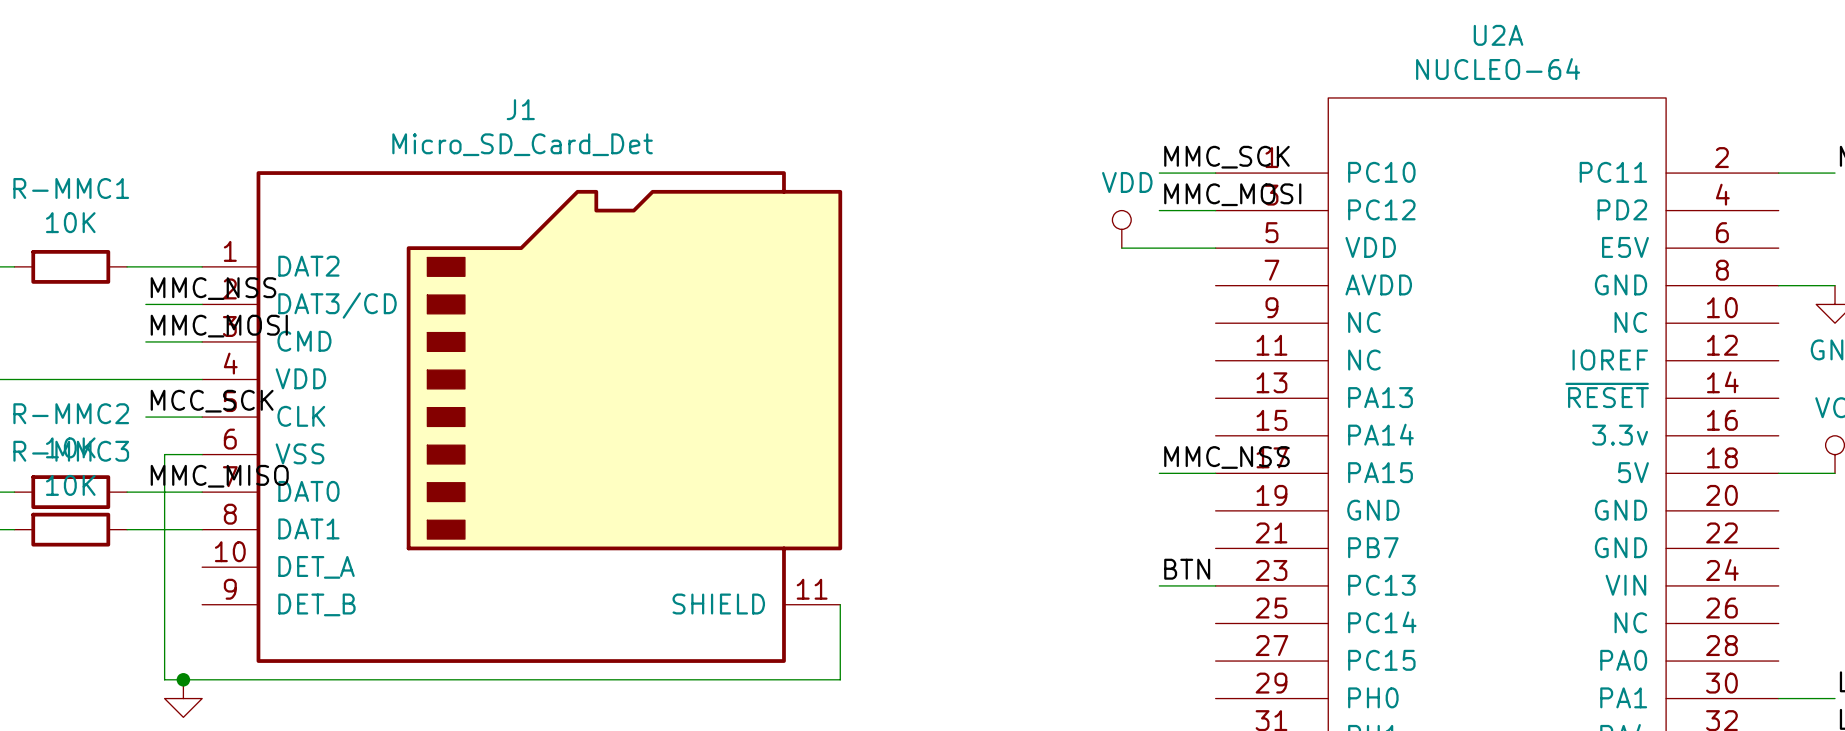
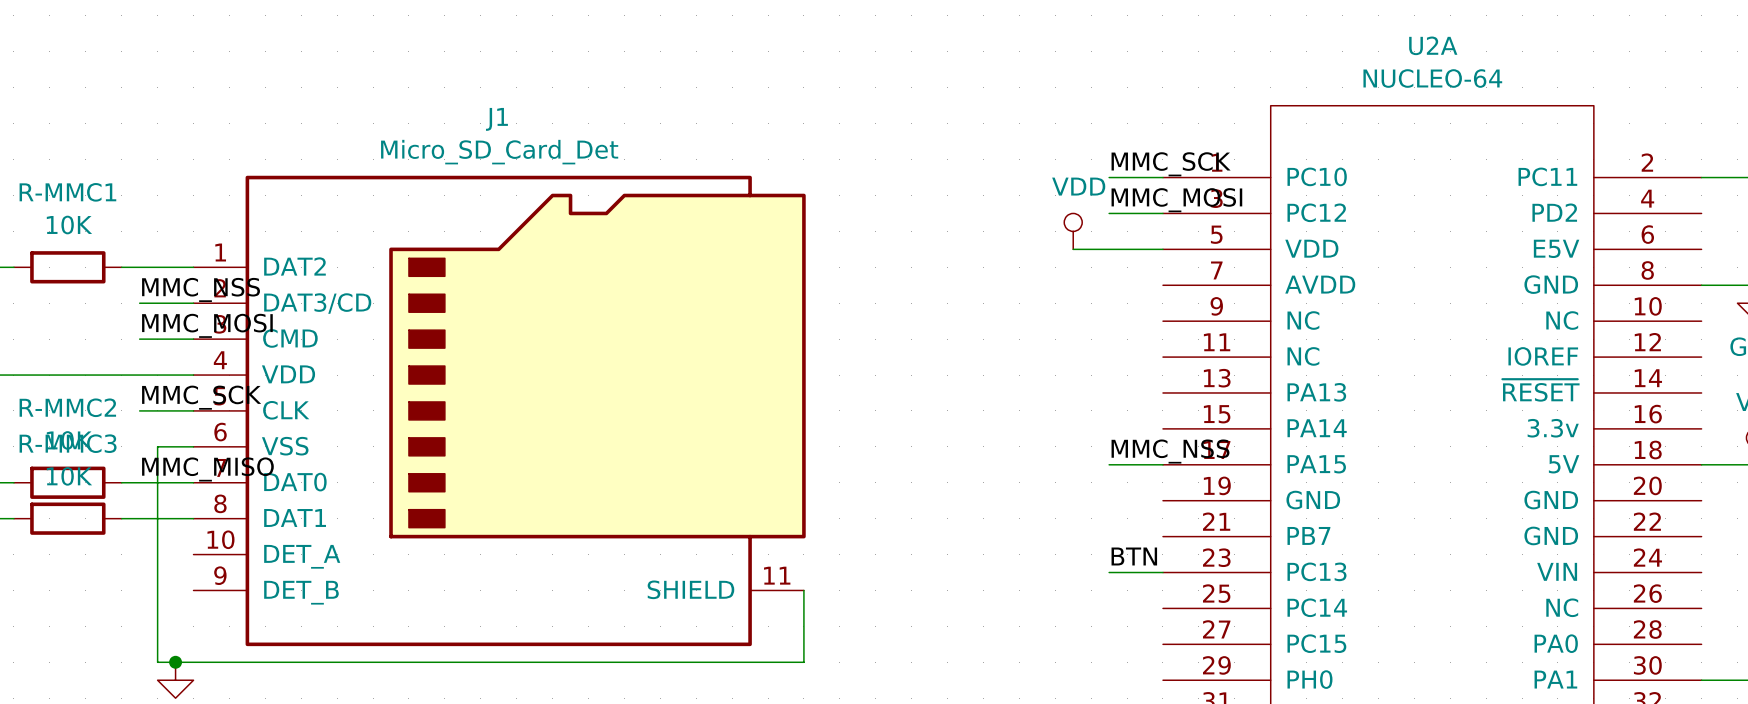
label: MCC_SCK (212, 401) -> MMC_SCK (201, 397)

